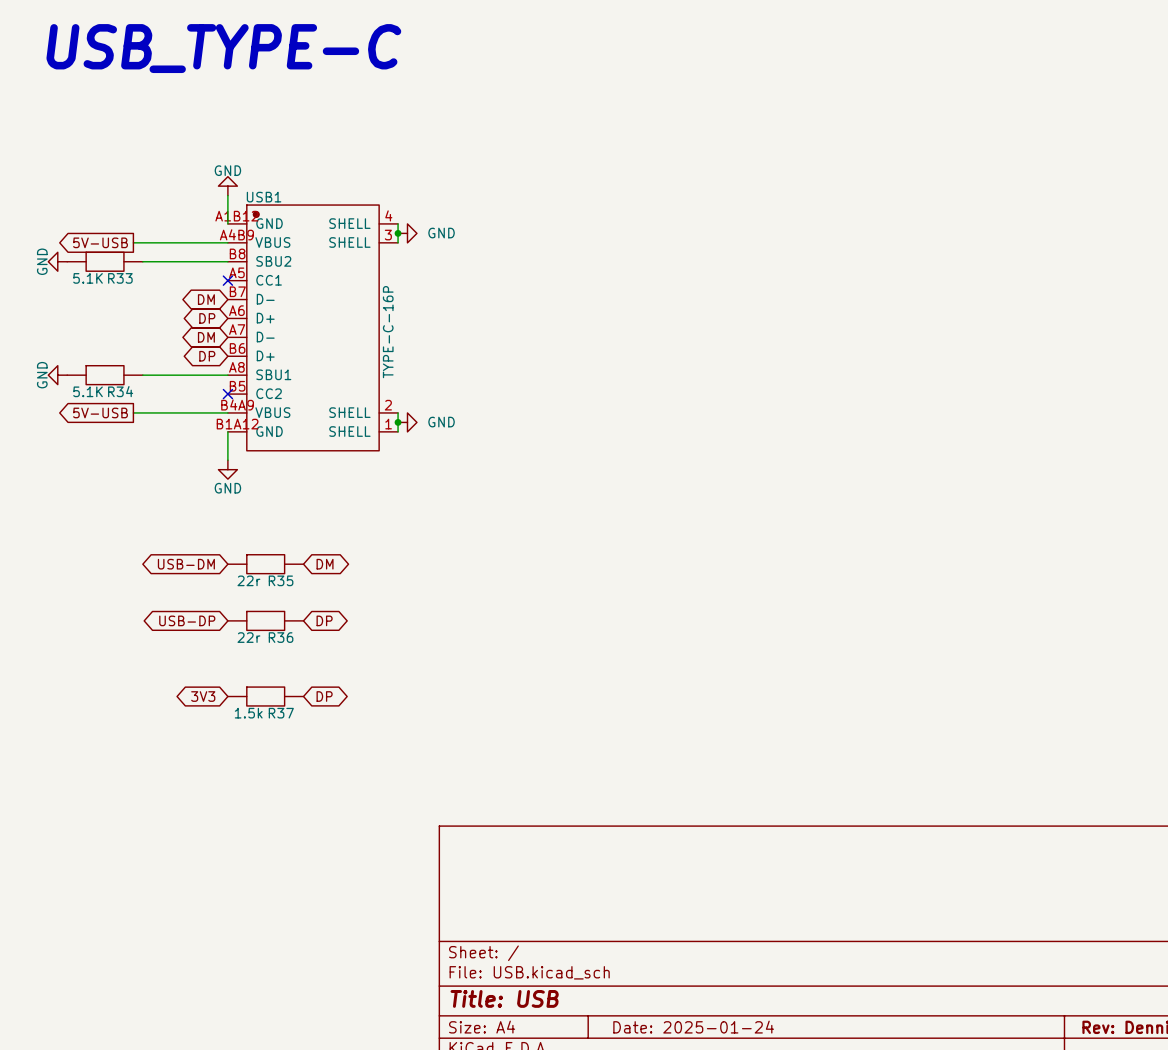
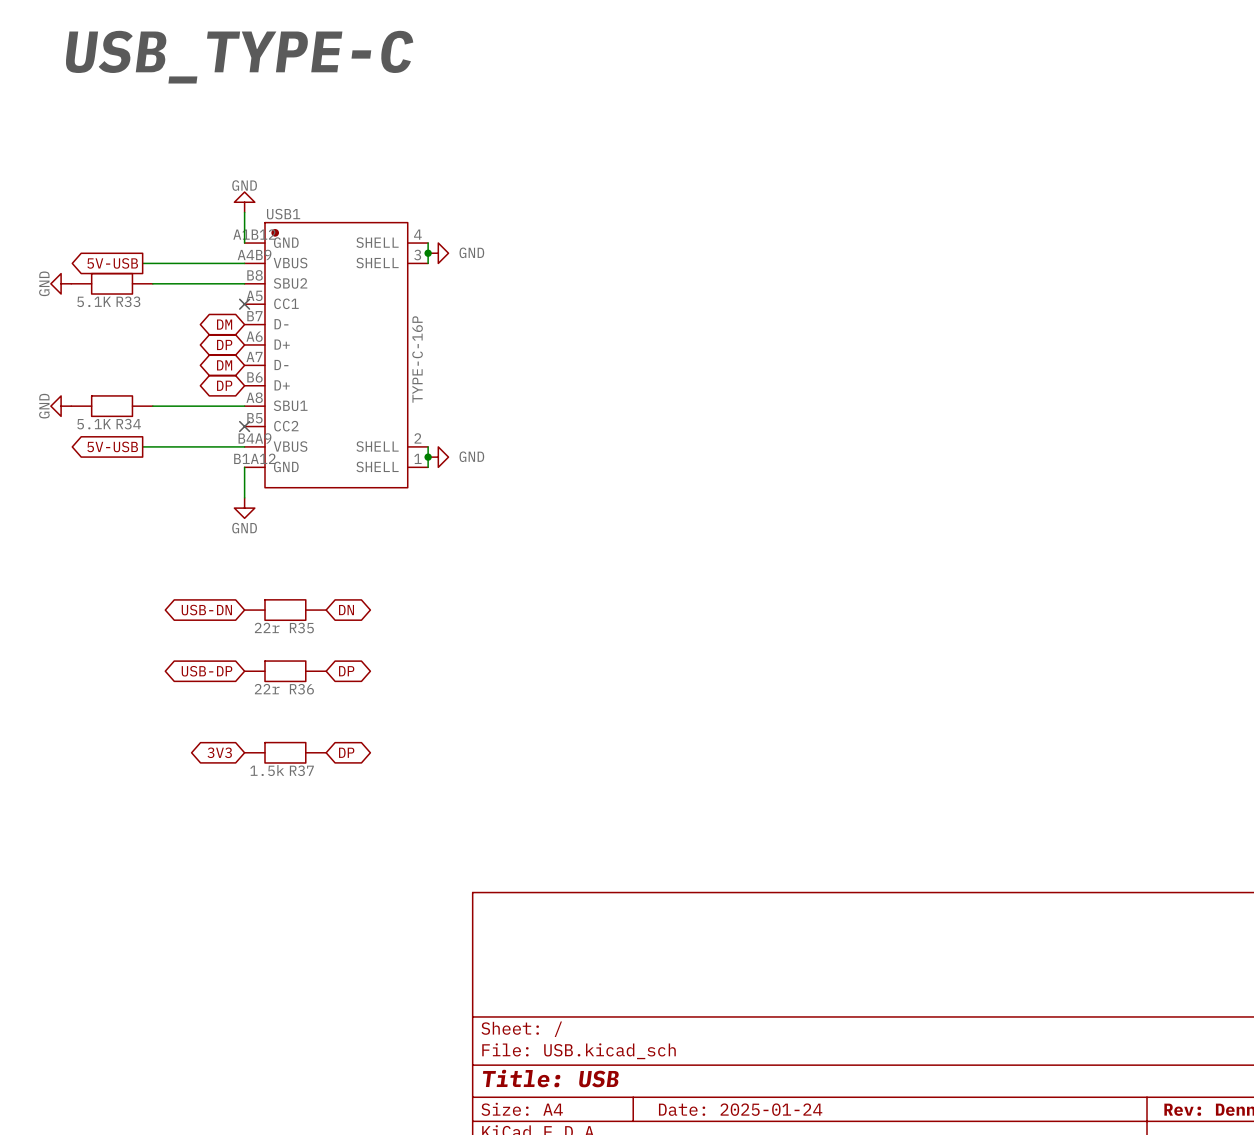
global label: USB-DM (186, 564) -> USB-DN (206, 610)
global label: DM (325, 564) -> DN (346, 610)

